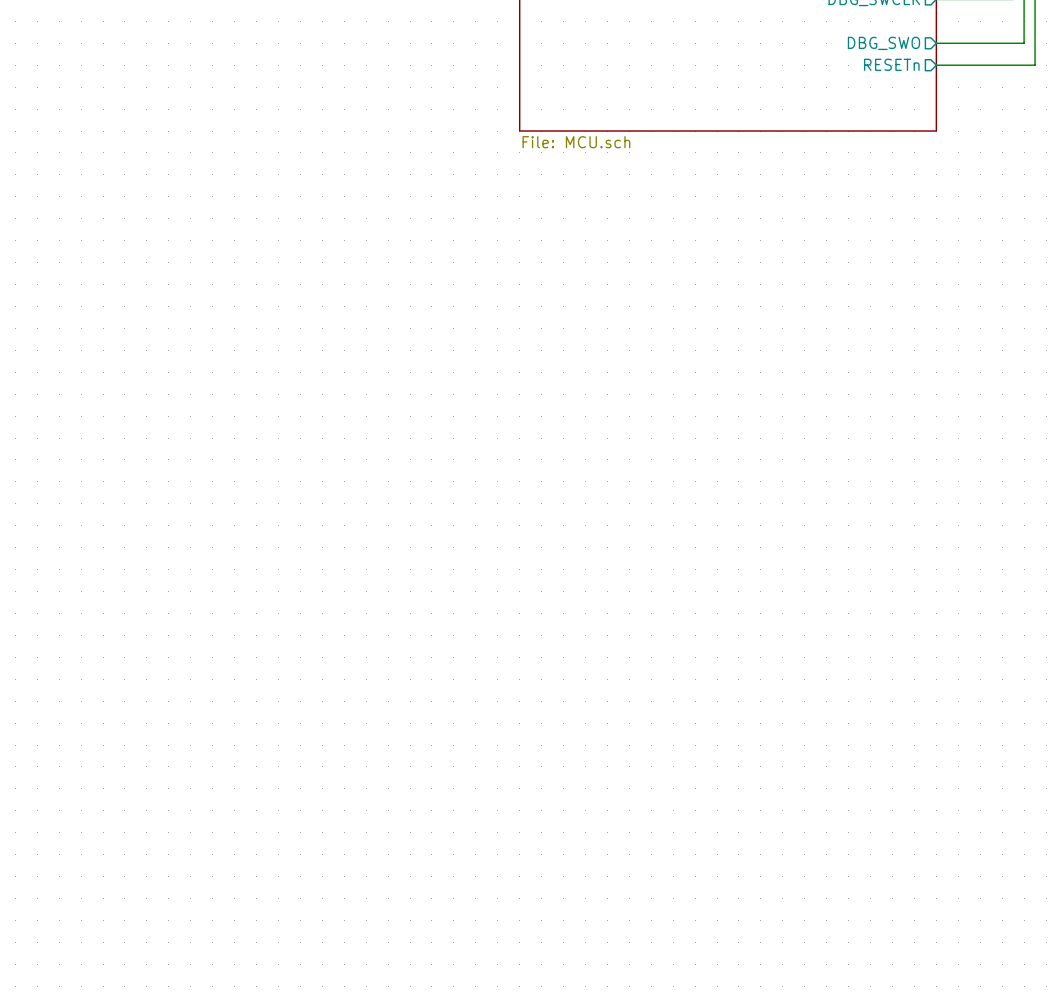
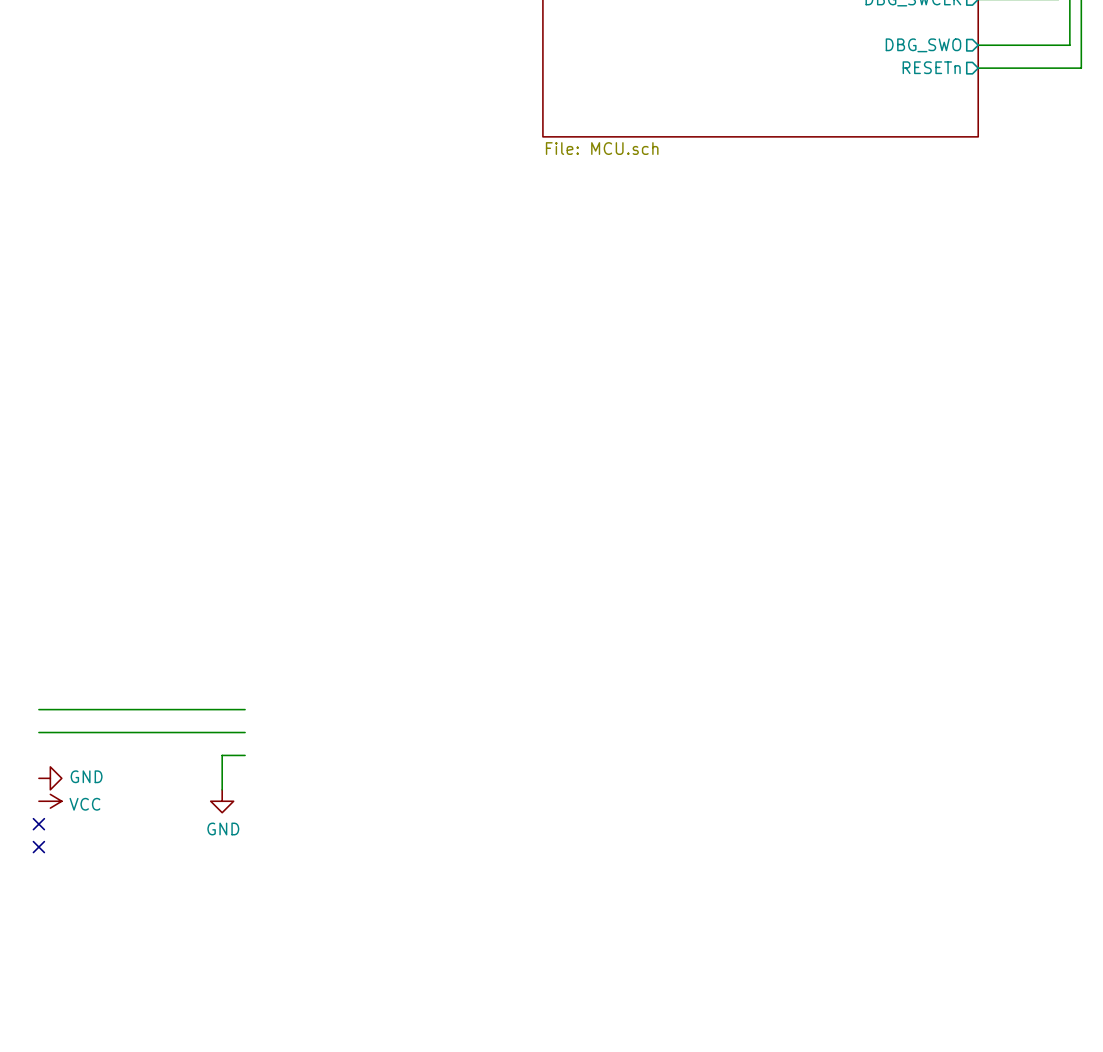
wire: none -> (38, 709) (245, 709)
wire: none -> (38, 732) (245, 732)
wire: none -> (245, 755) (222, 755) (222, 789)
power symbol: none -> GND (50, 778)
power symbol: none -> VCC (50, 801)
power symbol: none -> GND (222, 801)
no-connect mark: none -> (38, 824)
no-connect mark: none -> (38, 847)

